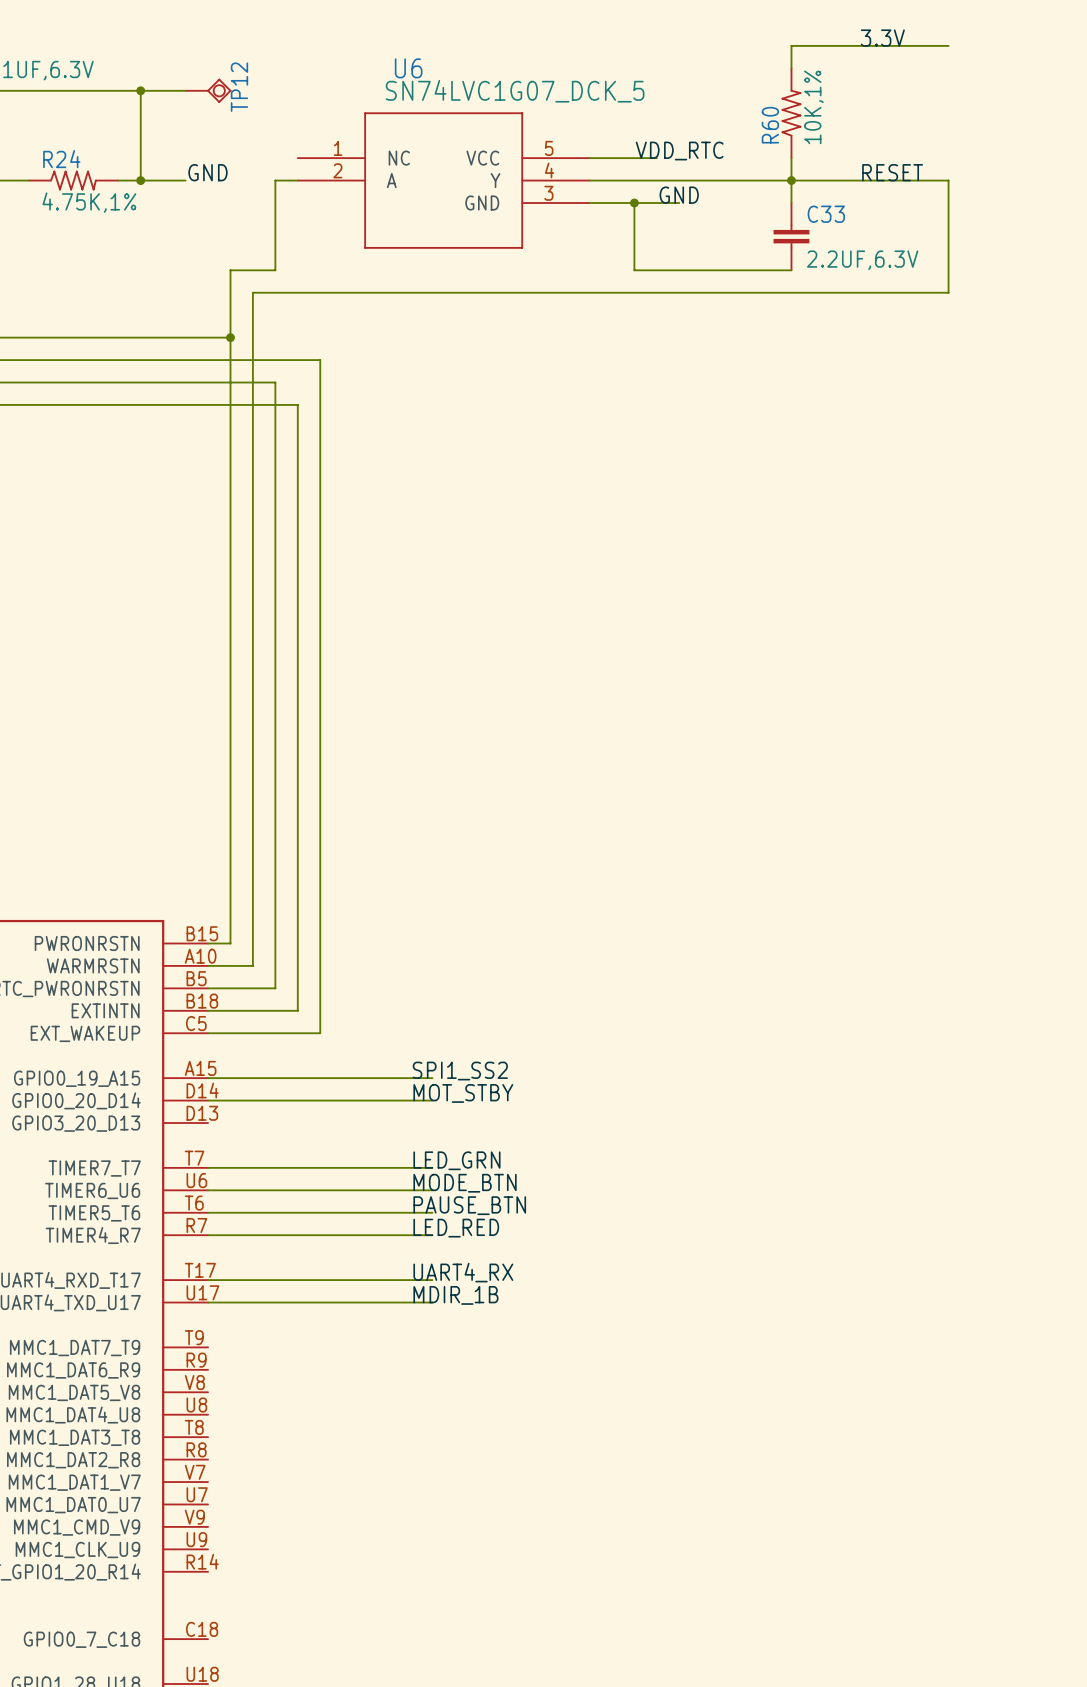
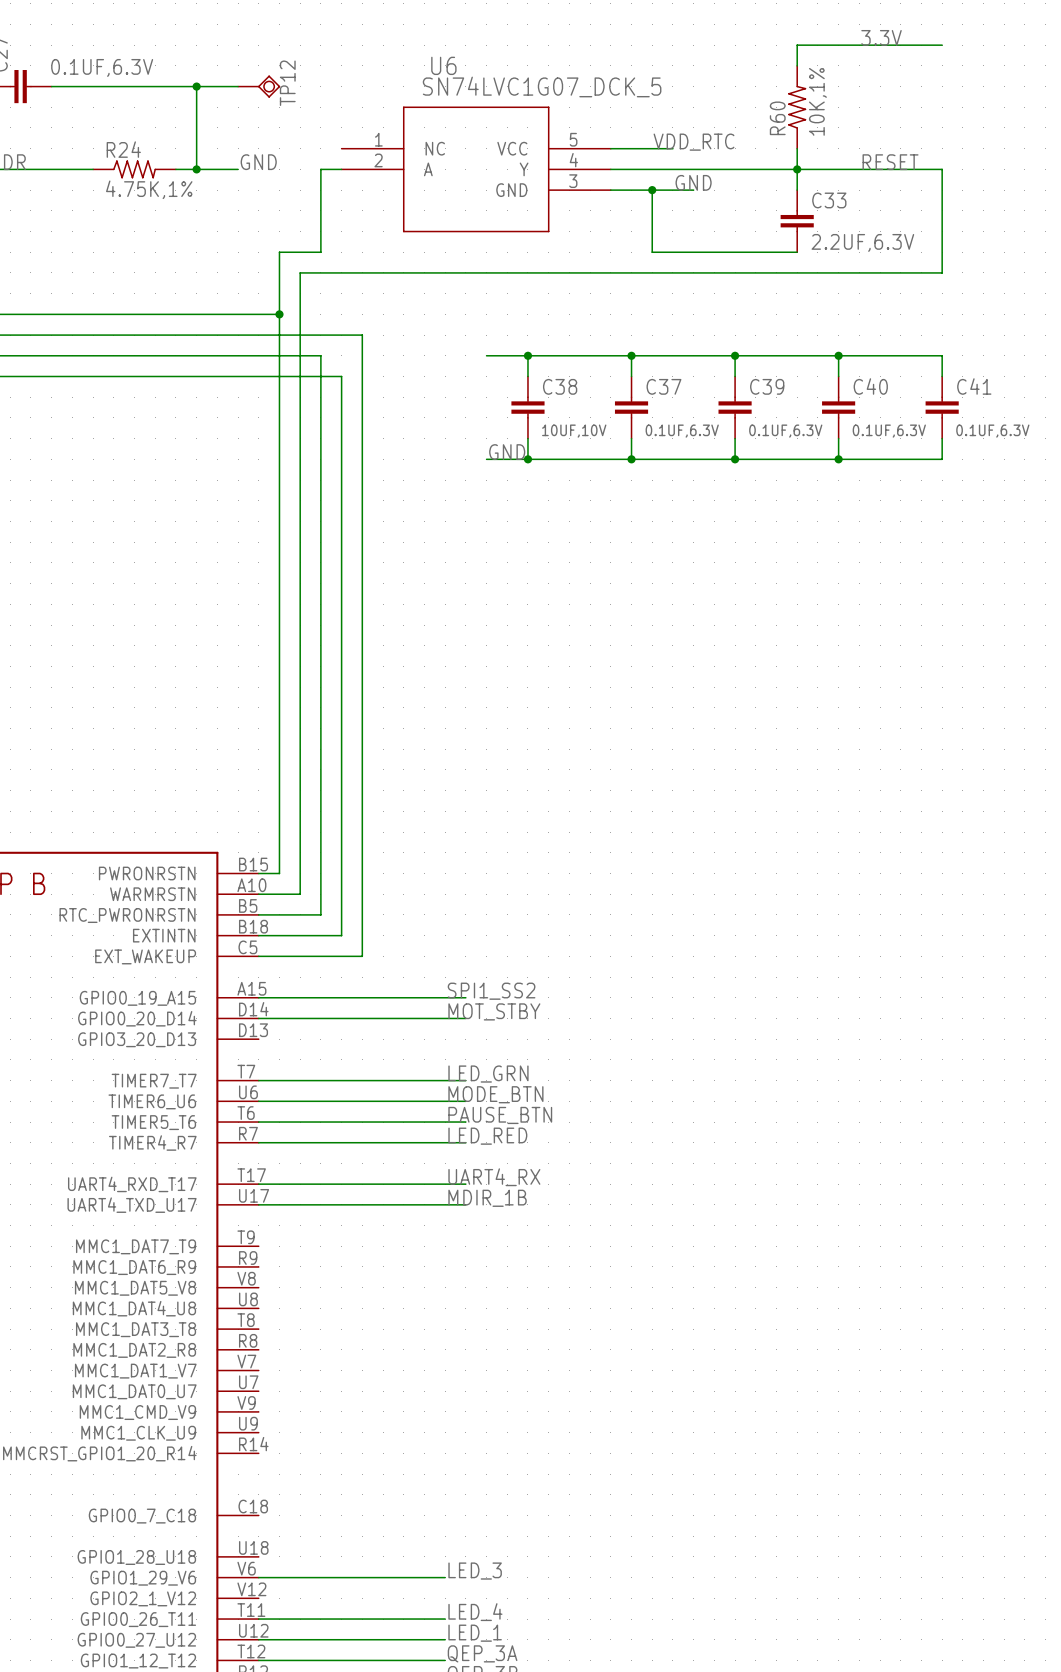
wire: none -> (486, 355) (942, 355) (942, 376)
wire: none -> (527, 355) (527, 376)
junction: none -> (527, 355)
wire: none -> (631, 355) (631, 376)
junction: none -> (631, 355)
wire: none -> (735, 355) (735, 376)
junction: none -> (735, 355)
wire: none -> (838, 355) (838, 376)
junction: none -> (838, 355)
C38: none -> 10UF,10V (527, 407)
C37: none -> 0.1UF,6.3V (631, 407)
C39: none -> 0.1UF,6.3V (735, 407)
C40: none -> 0.1UF,6.3V (838, 407)
C41: none -> 0.1UF,6.3V (942, 407)
wire: none -> (527, 438) (527, 459)
wire: none -> (631, 438) (631, 459)
wire: none -> (735, 438) (735, 459)
wire: none -> (838, 438) (838, 459)
wire: none -> (942, 438) (942, 459) (486, 459)
label: none -> GND (507, 452)
junction: none -> (527, 459)
junction: none -> (631, 459)
junction: none -> (735, 459)
junction: none -> (838, 459)

